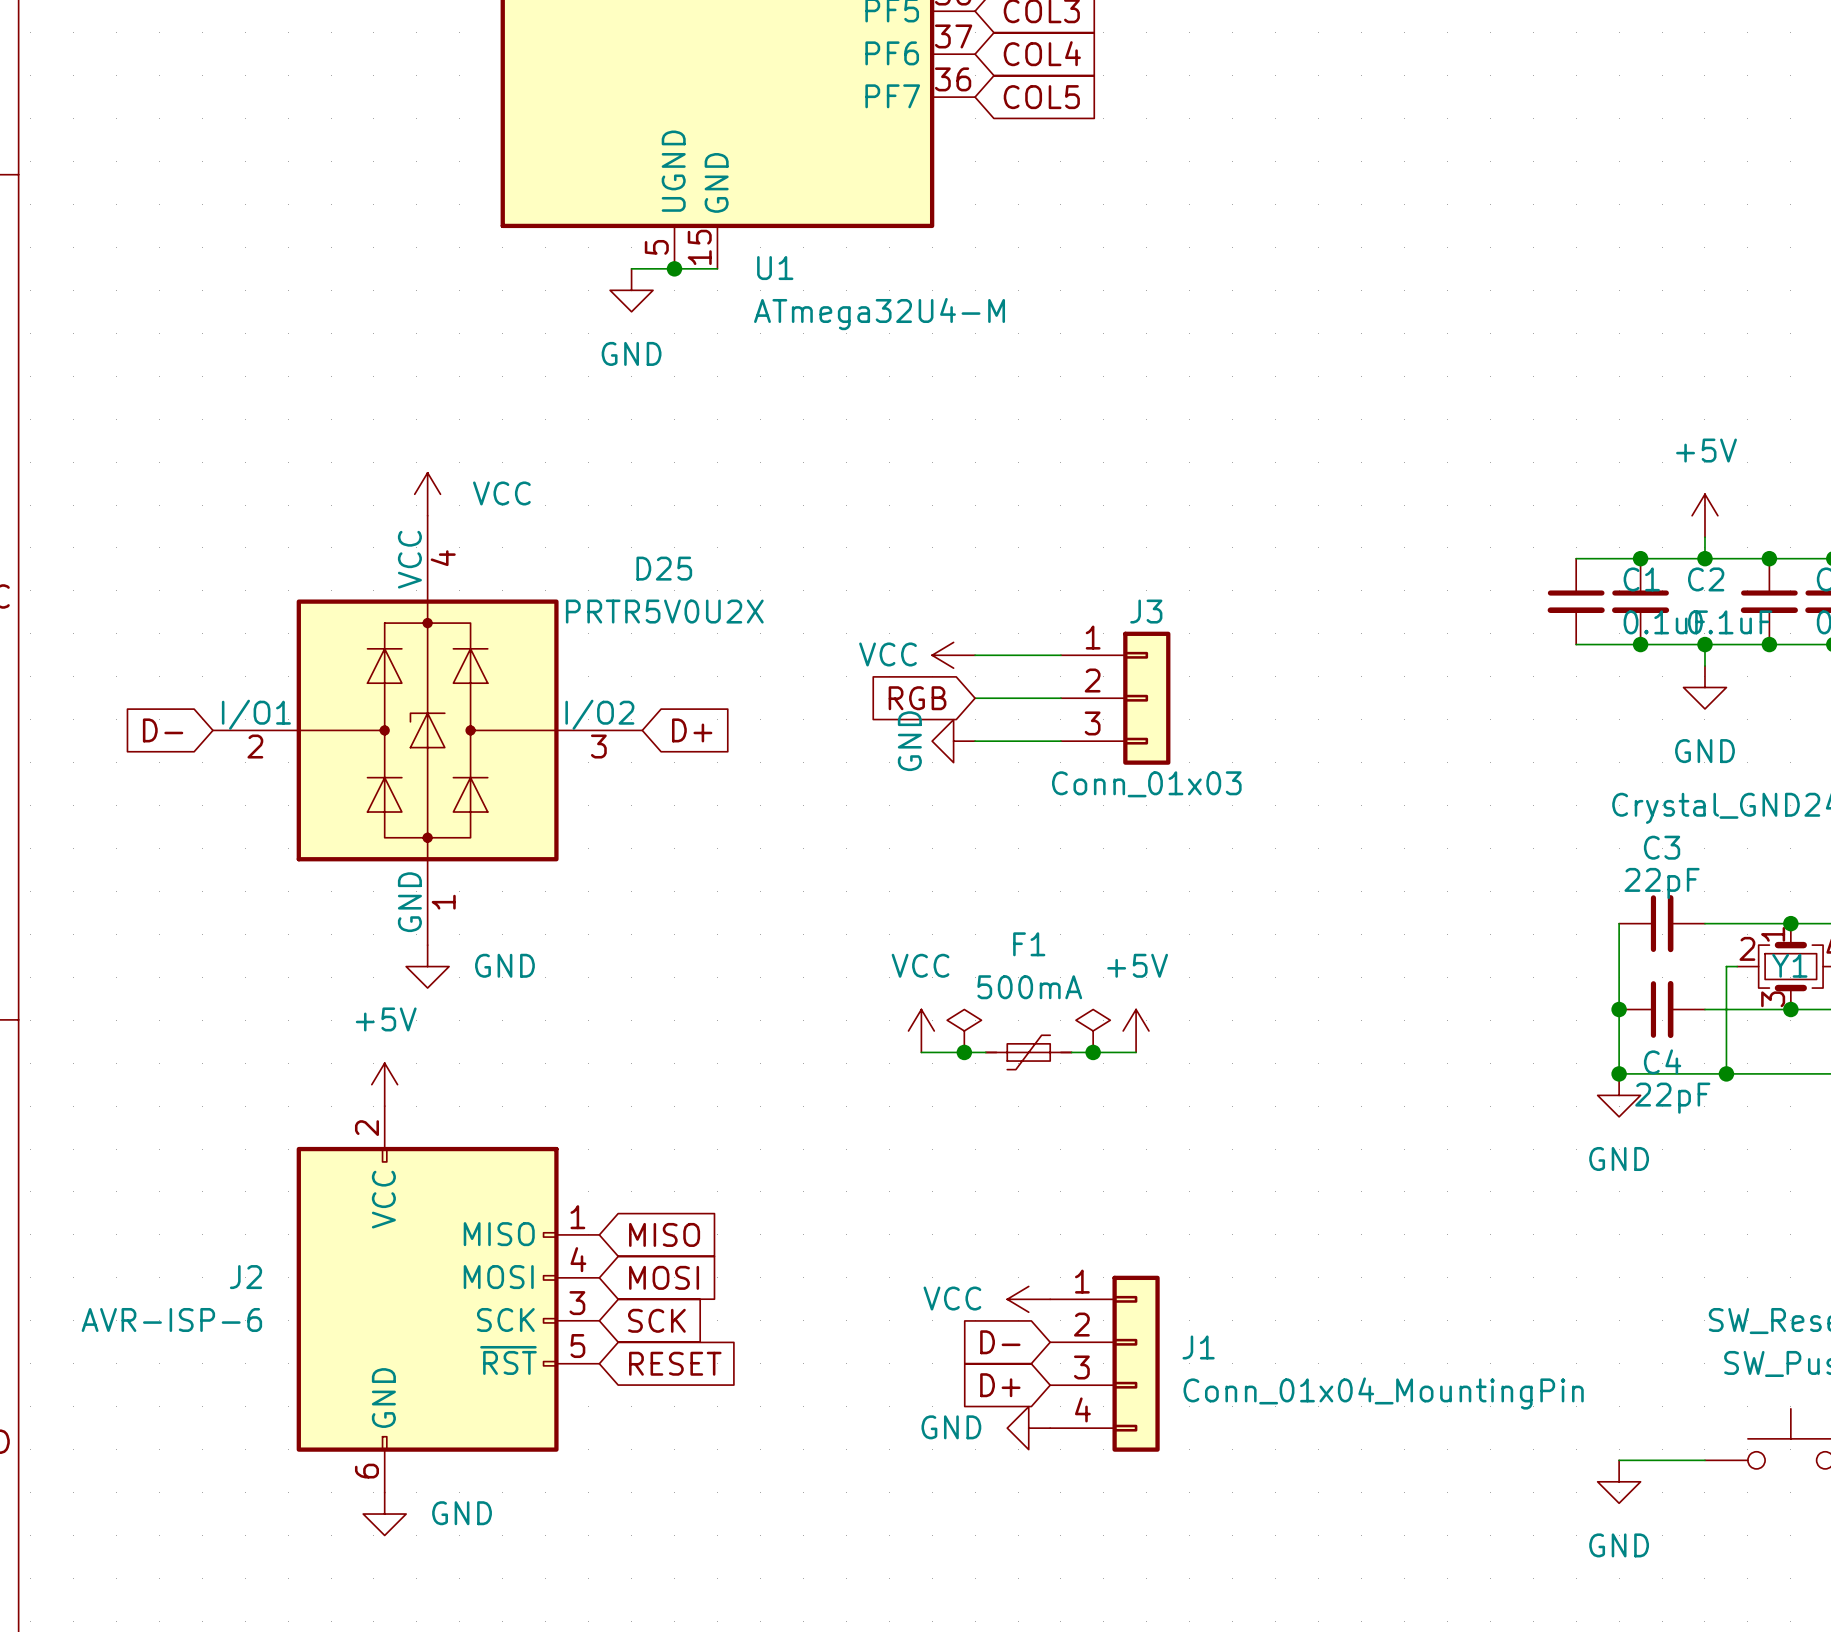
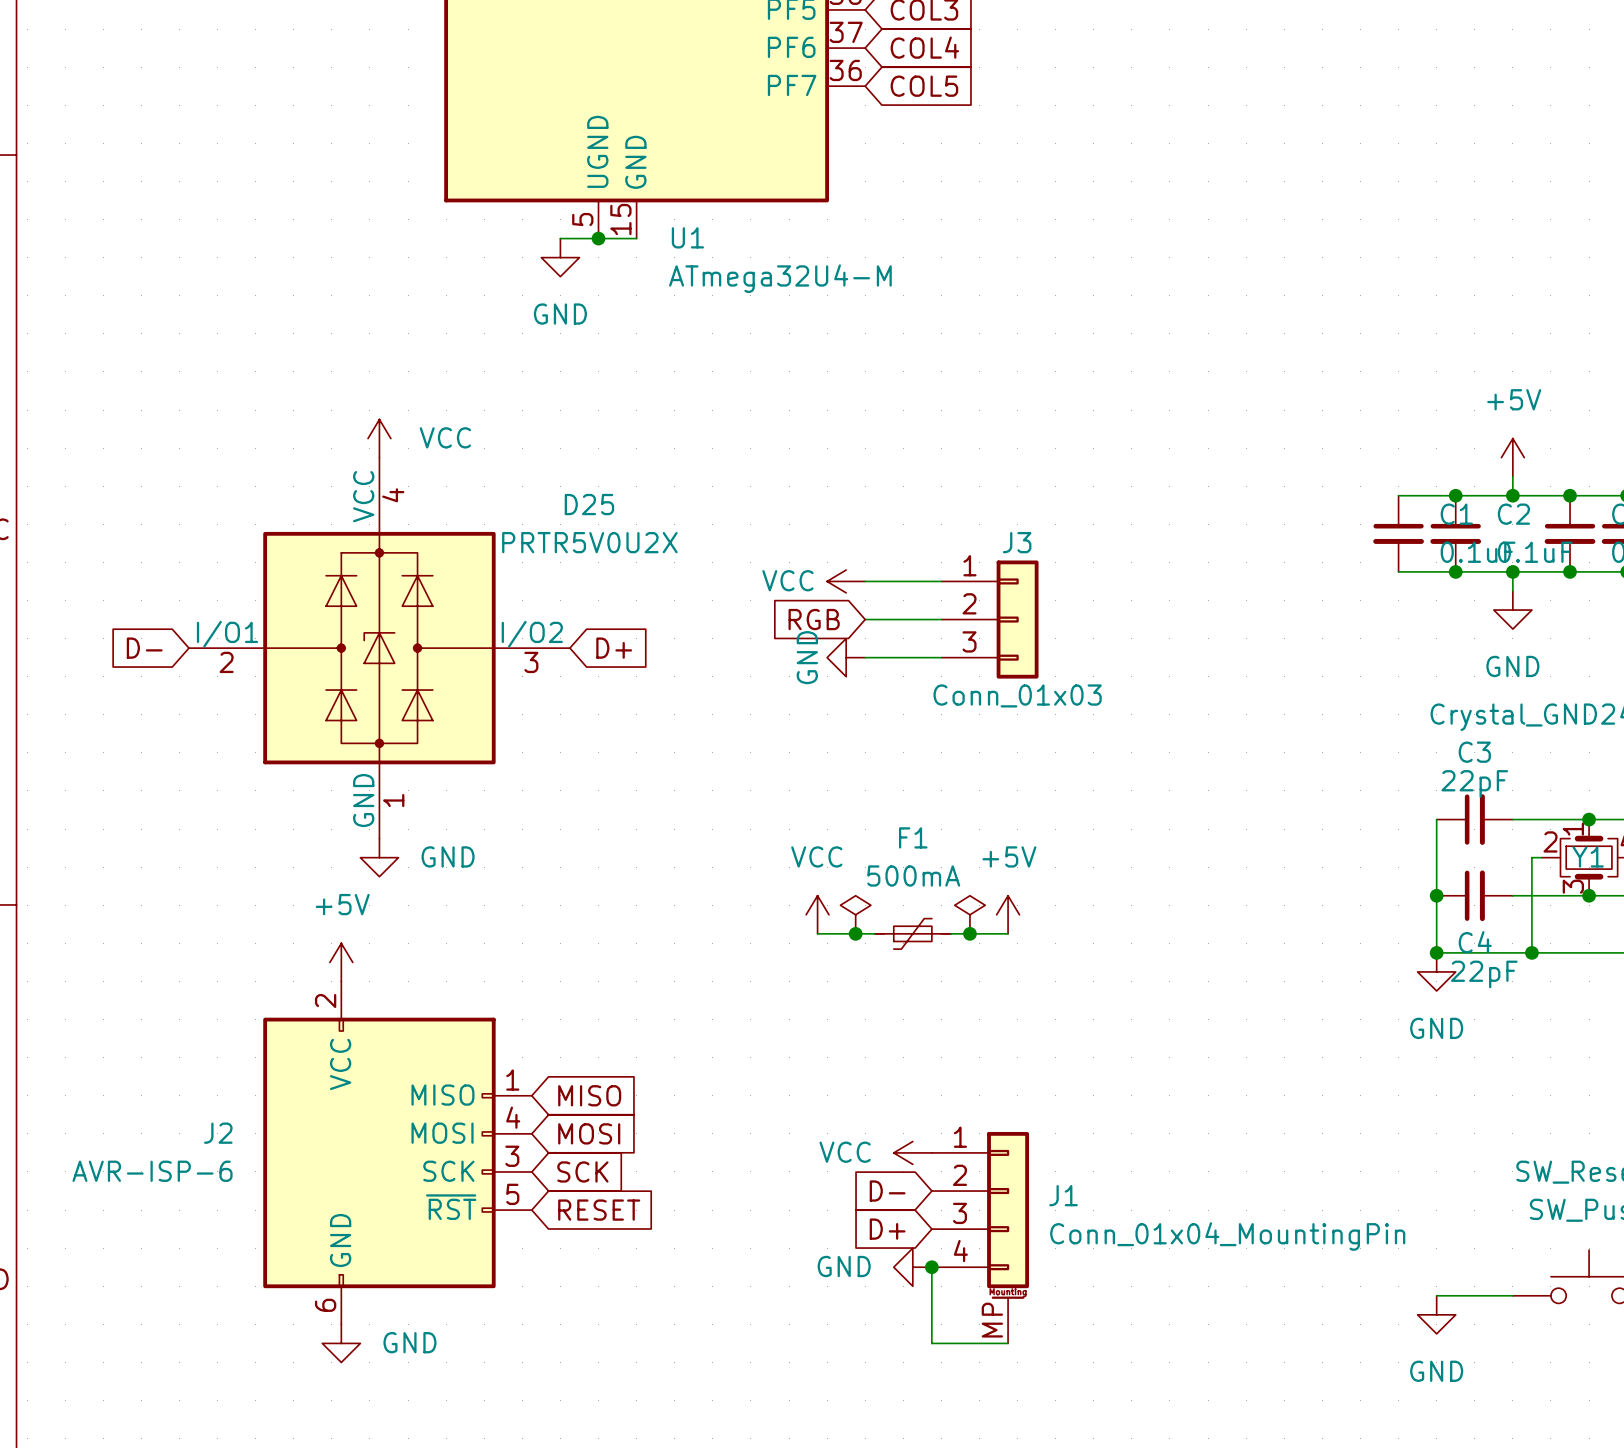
J1 symbol: [1050, 1275, 1160, 1452] -> [931, 1131, 1030, 1344]
wire: none -> (931, 1267) (931, 1343) (1008, 1343)
junction: none -> (931, 1267)

